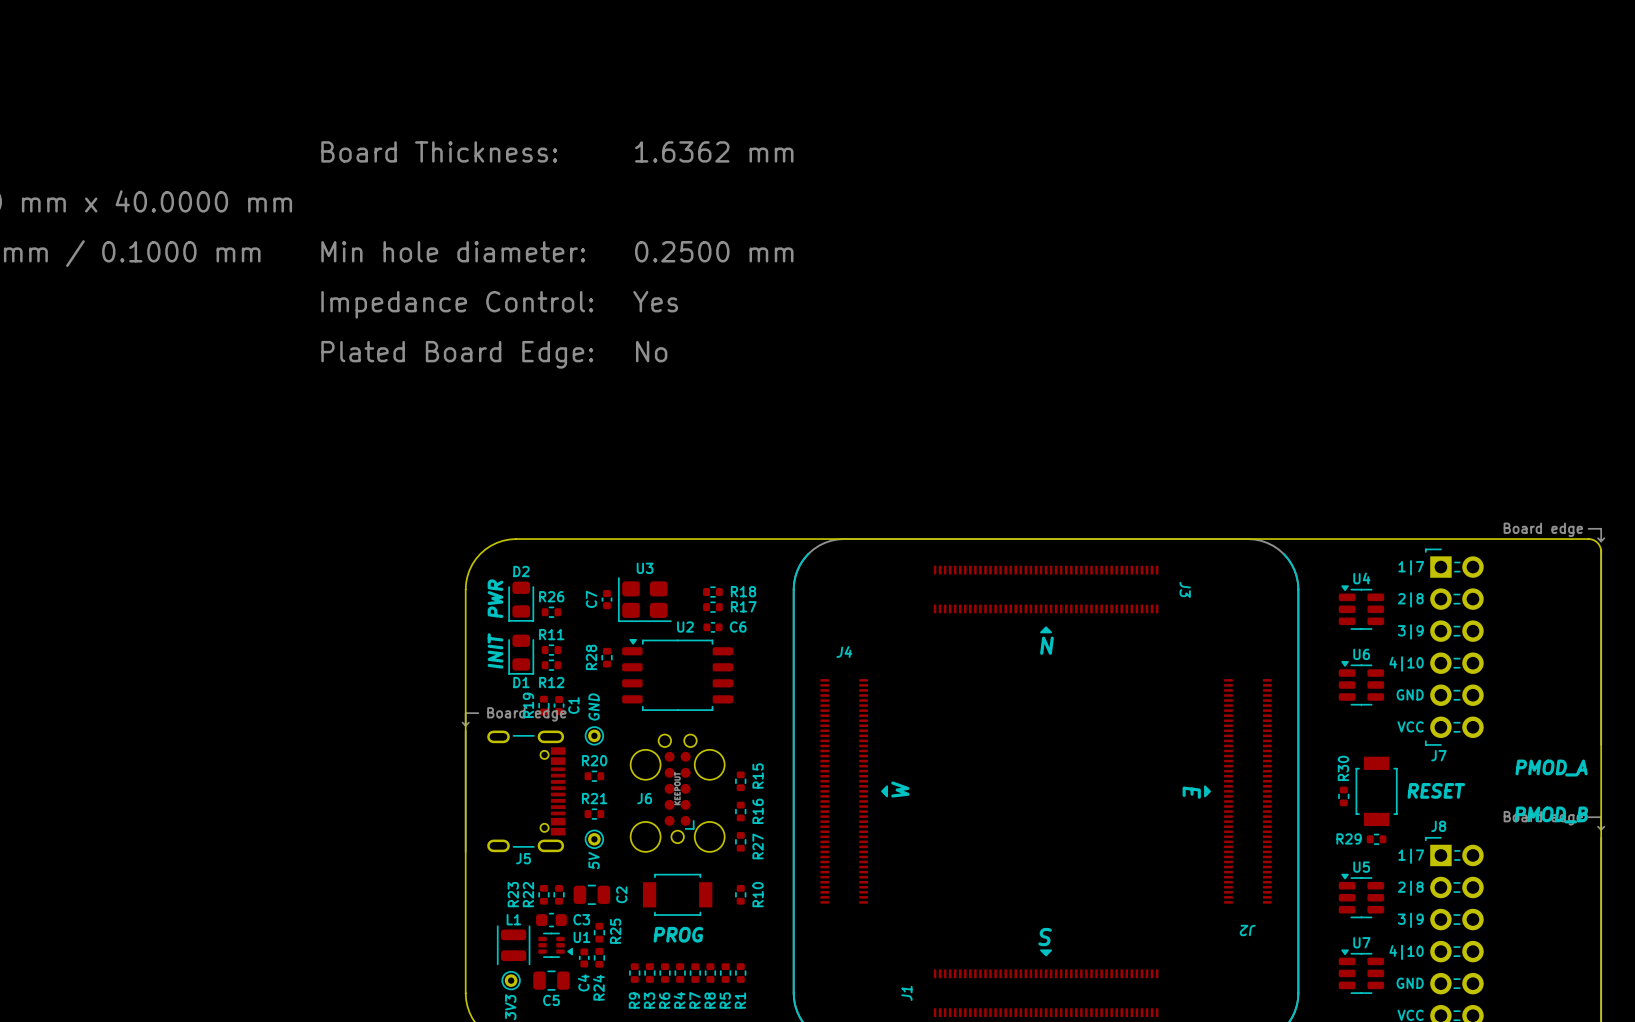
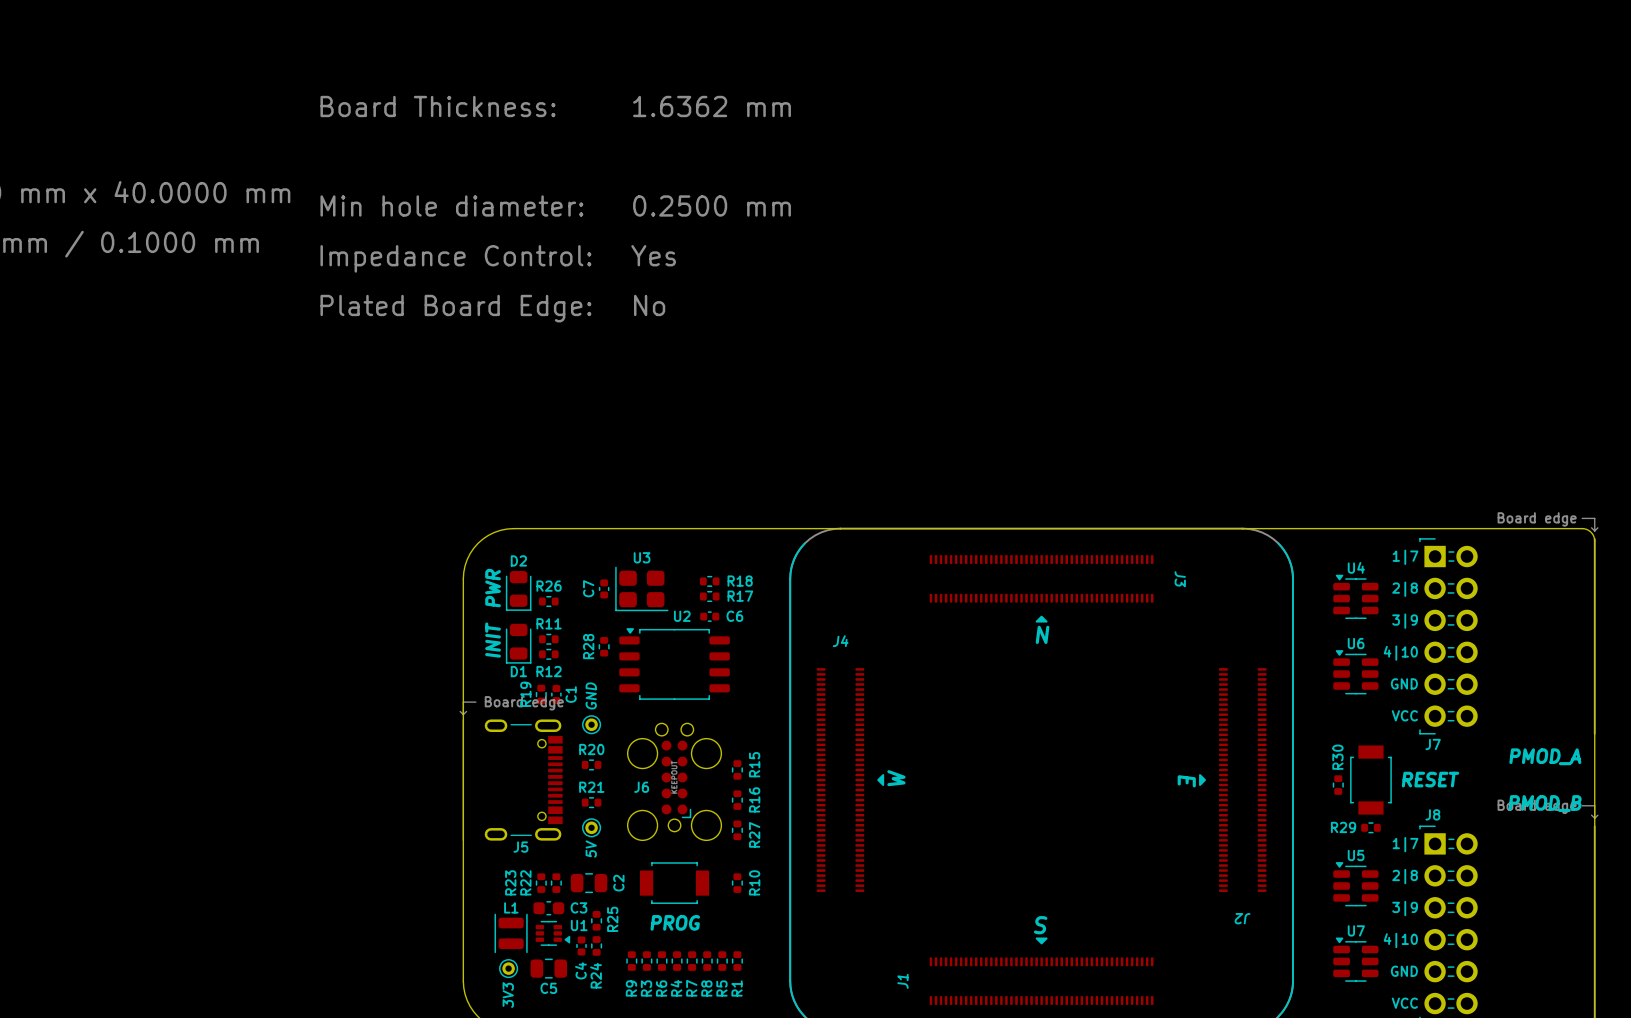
text position: Board Thickness: (439, 151) -> Board Thickness: (437, 106)
text position: 1.6362 mm (714, 151) -> 1.6362 mm (712, 106)
text position: Min hole diameter: (453, 251) -> Min hole diameter: (451, 205)
text position: 0.2500 mm (714, 251) -> 0.2500 mm (712, 205)
text position: Yes (655, 301) -> Yes (653, 255)
text position: Impedance Control: (457, 304) -> Impedance Control: (455, 258)
text position: No (651, 351) -> No (649, 305)
text position: Plated Board Edge: (457, 354) -> Plated Board Edge: (455, 308)

